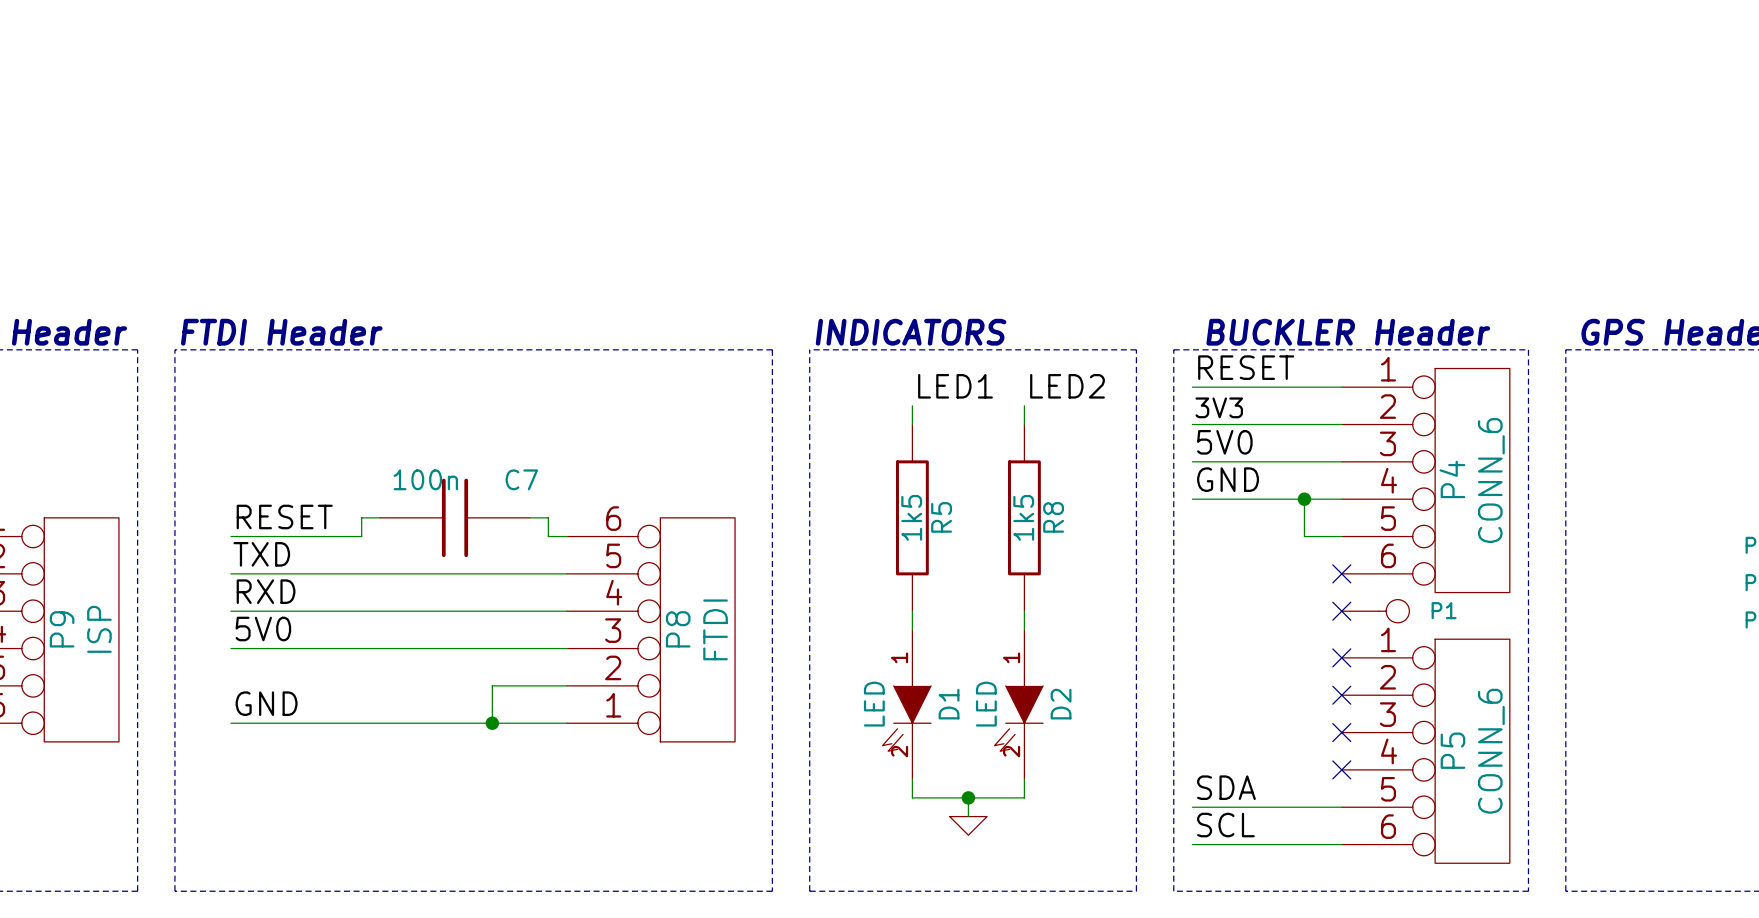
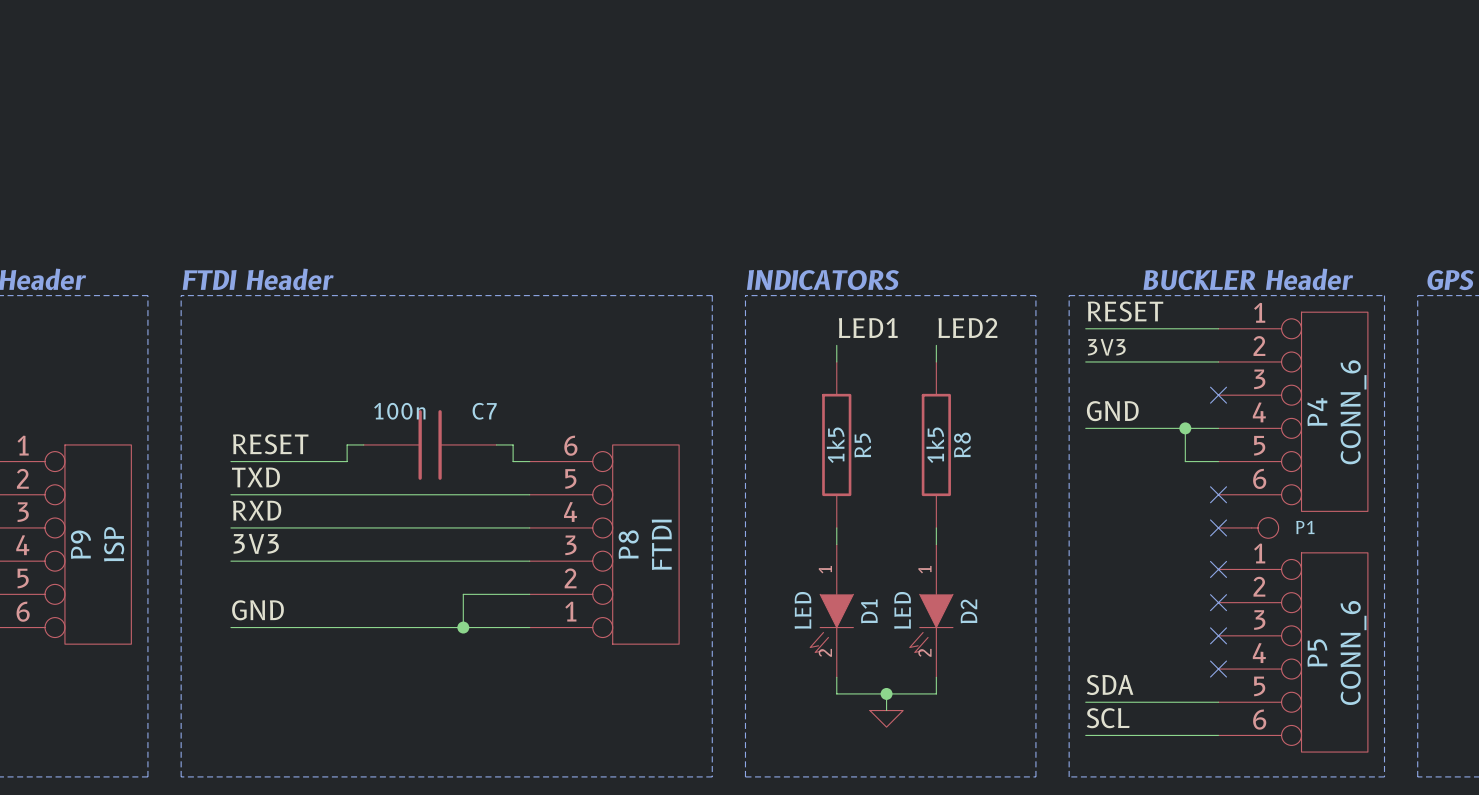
label: 5V0 (1224, 442) -> none
wire: (1192, 461) (1341, 461) -> none
no-connect mark: none -> (1218, 395)
label: 5V0 (263, 629) -> 3V3 (256, 543)

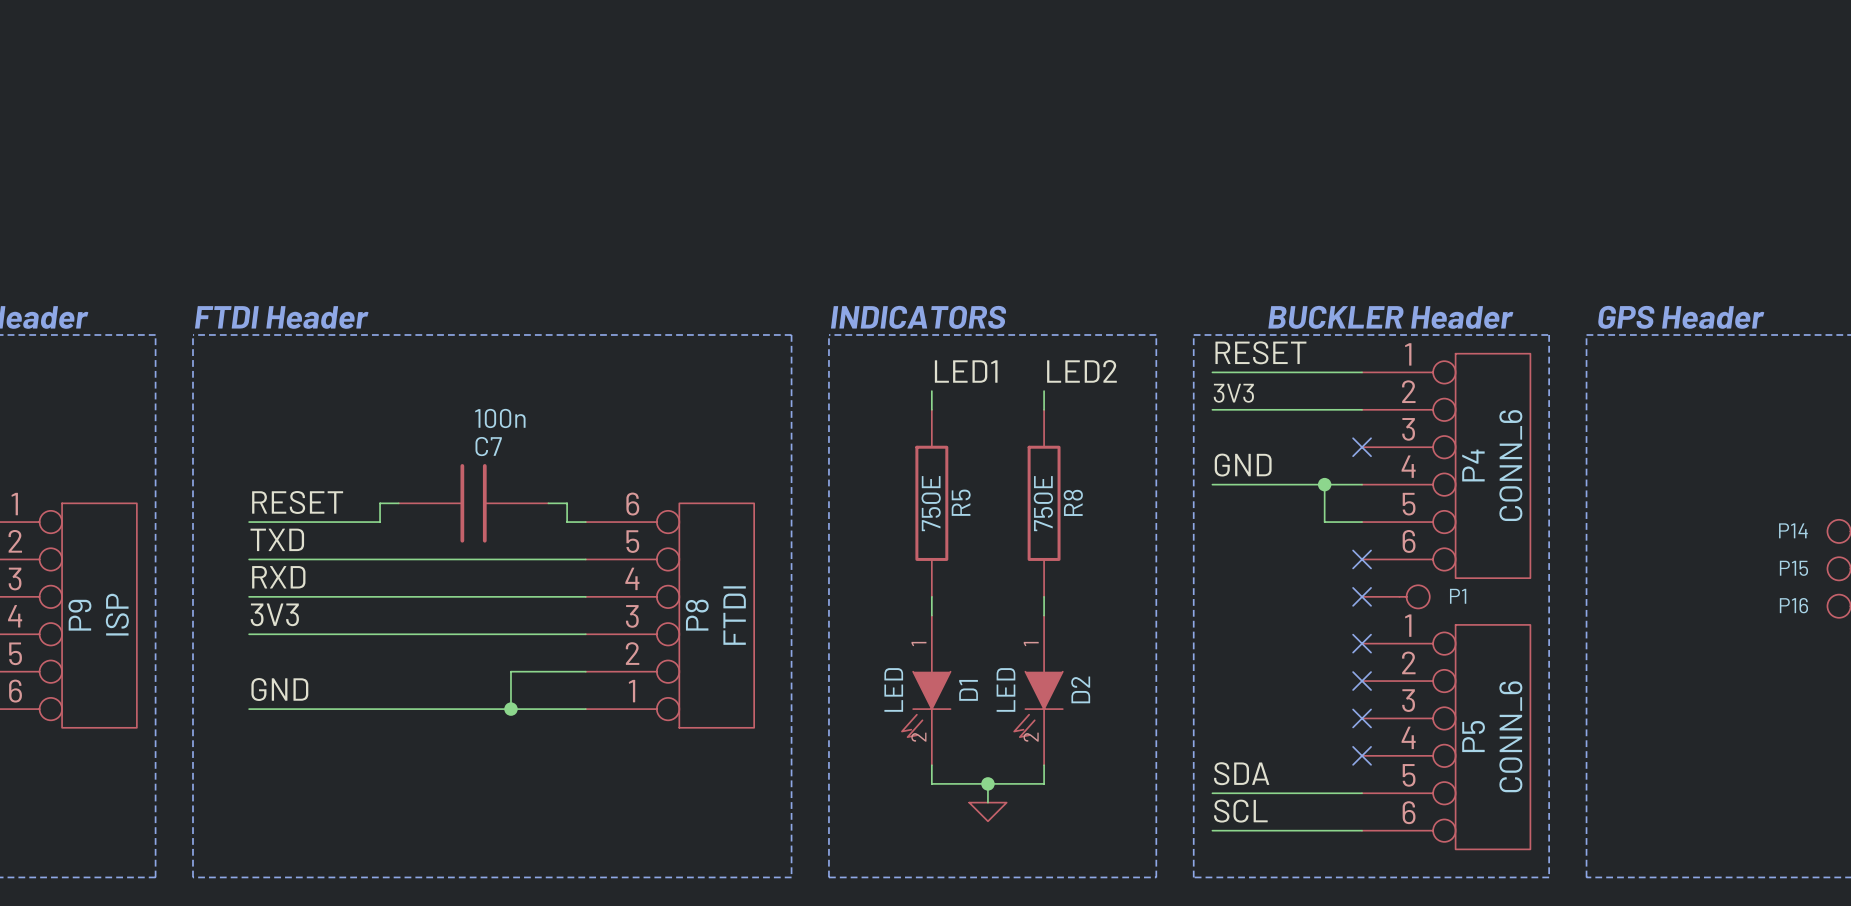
C7 value position: 100n (399, 411) -> 100n (500, 418)
C7 name position: C7 (484, 411) -> C7 (488, 446)
R5 value: 1k5 (835, 445) -> 750E (931, 503)
R8 value: 1k5 (935, 445) -> 750E (1043, 503)

